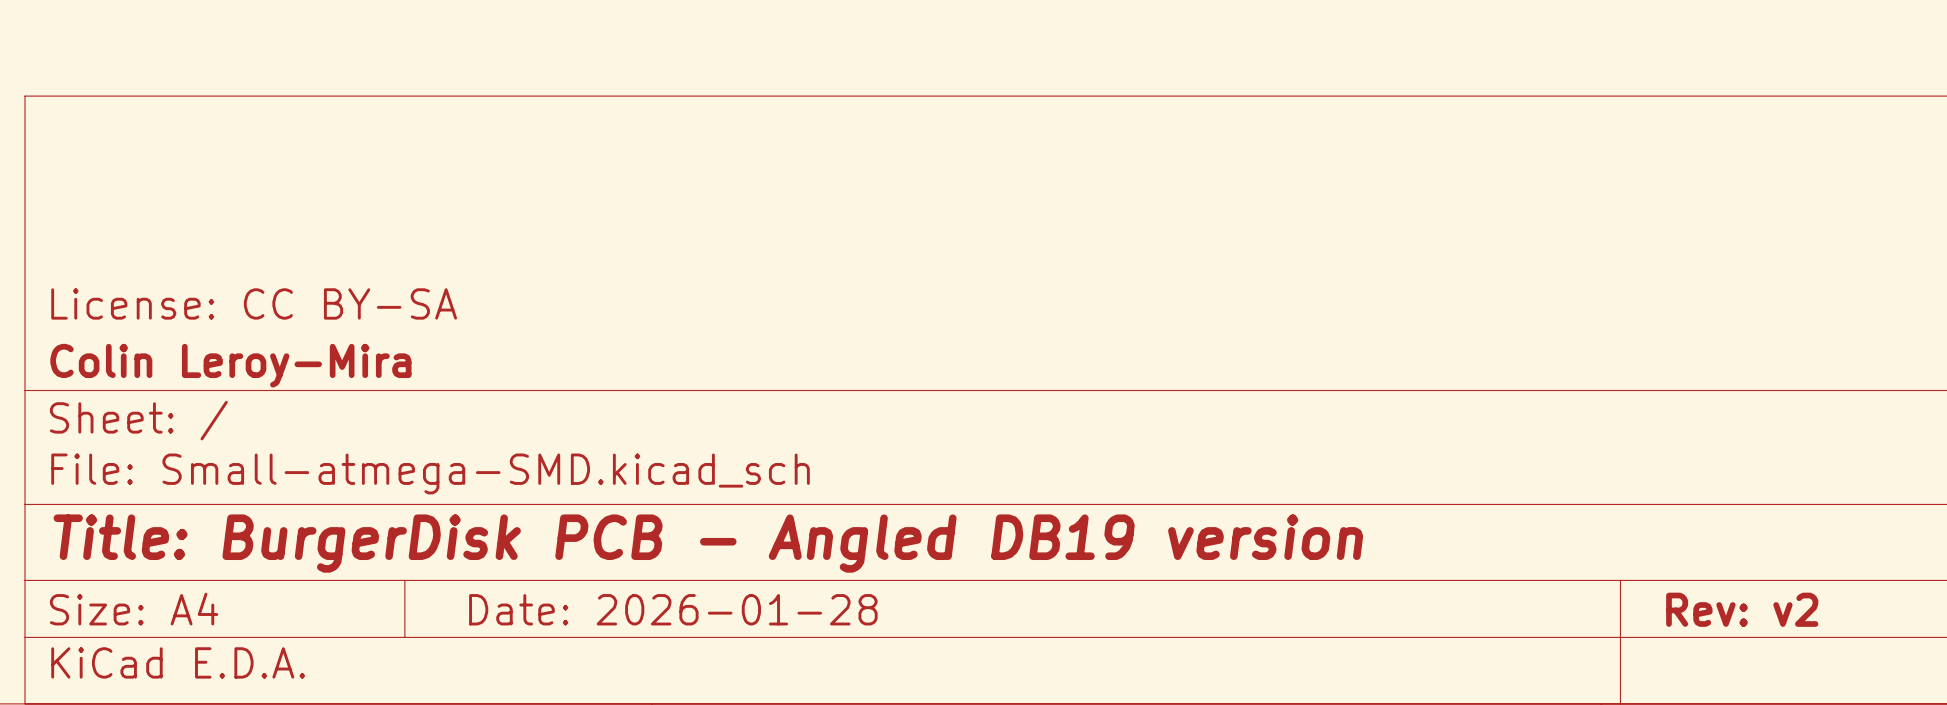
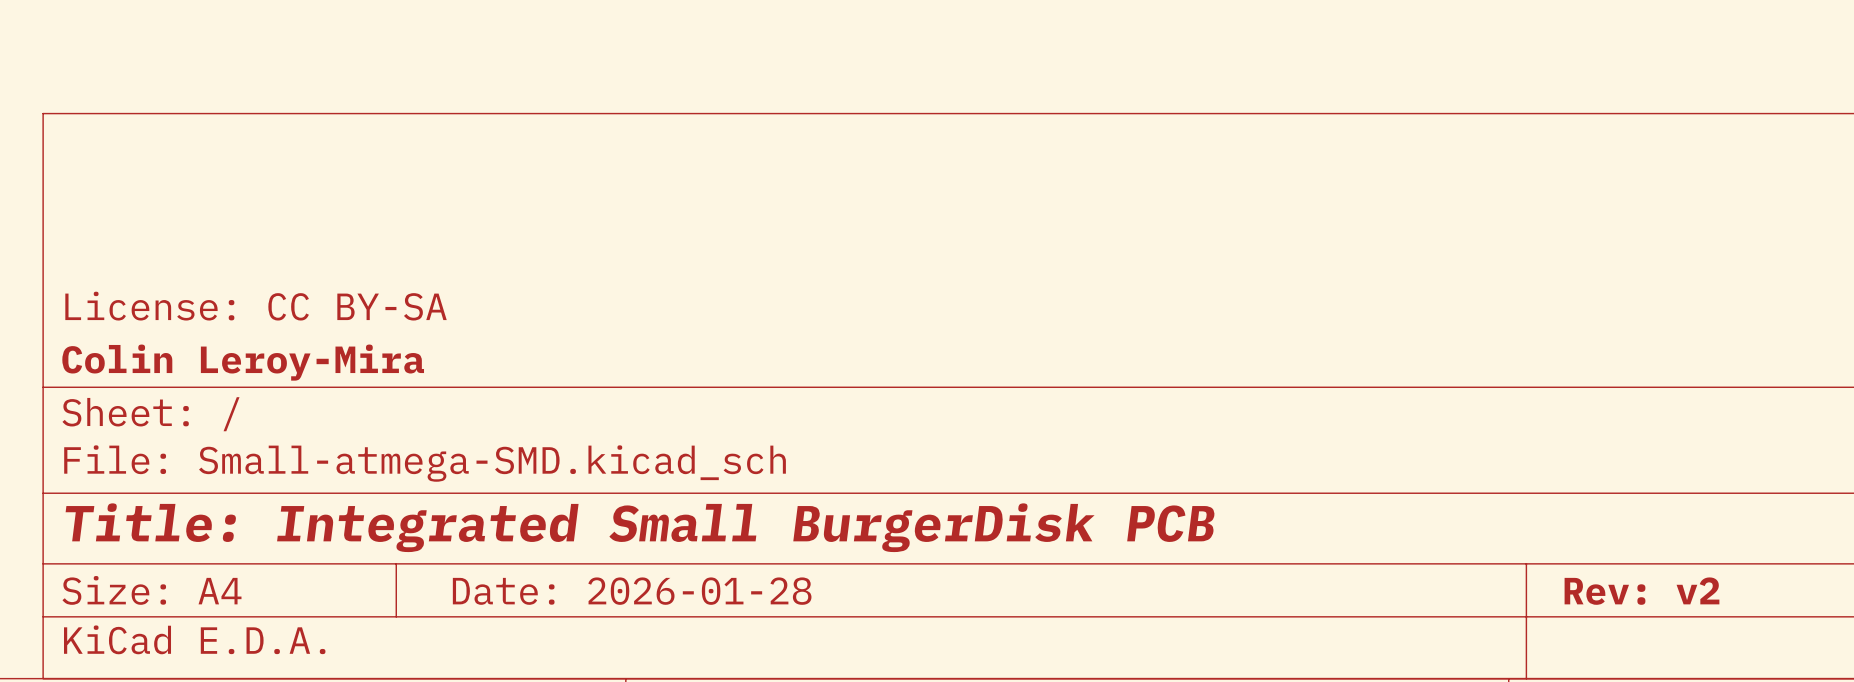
title block: Title: BurgerDisk PCB - Angled DB19 version (708, 543) -> Title: Integrated Small BurgerDisk PCB (640, 527)

